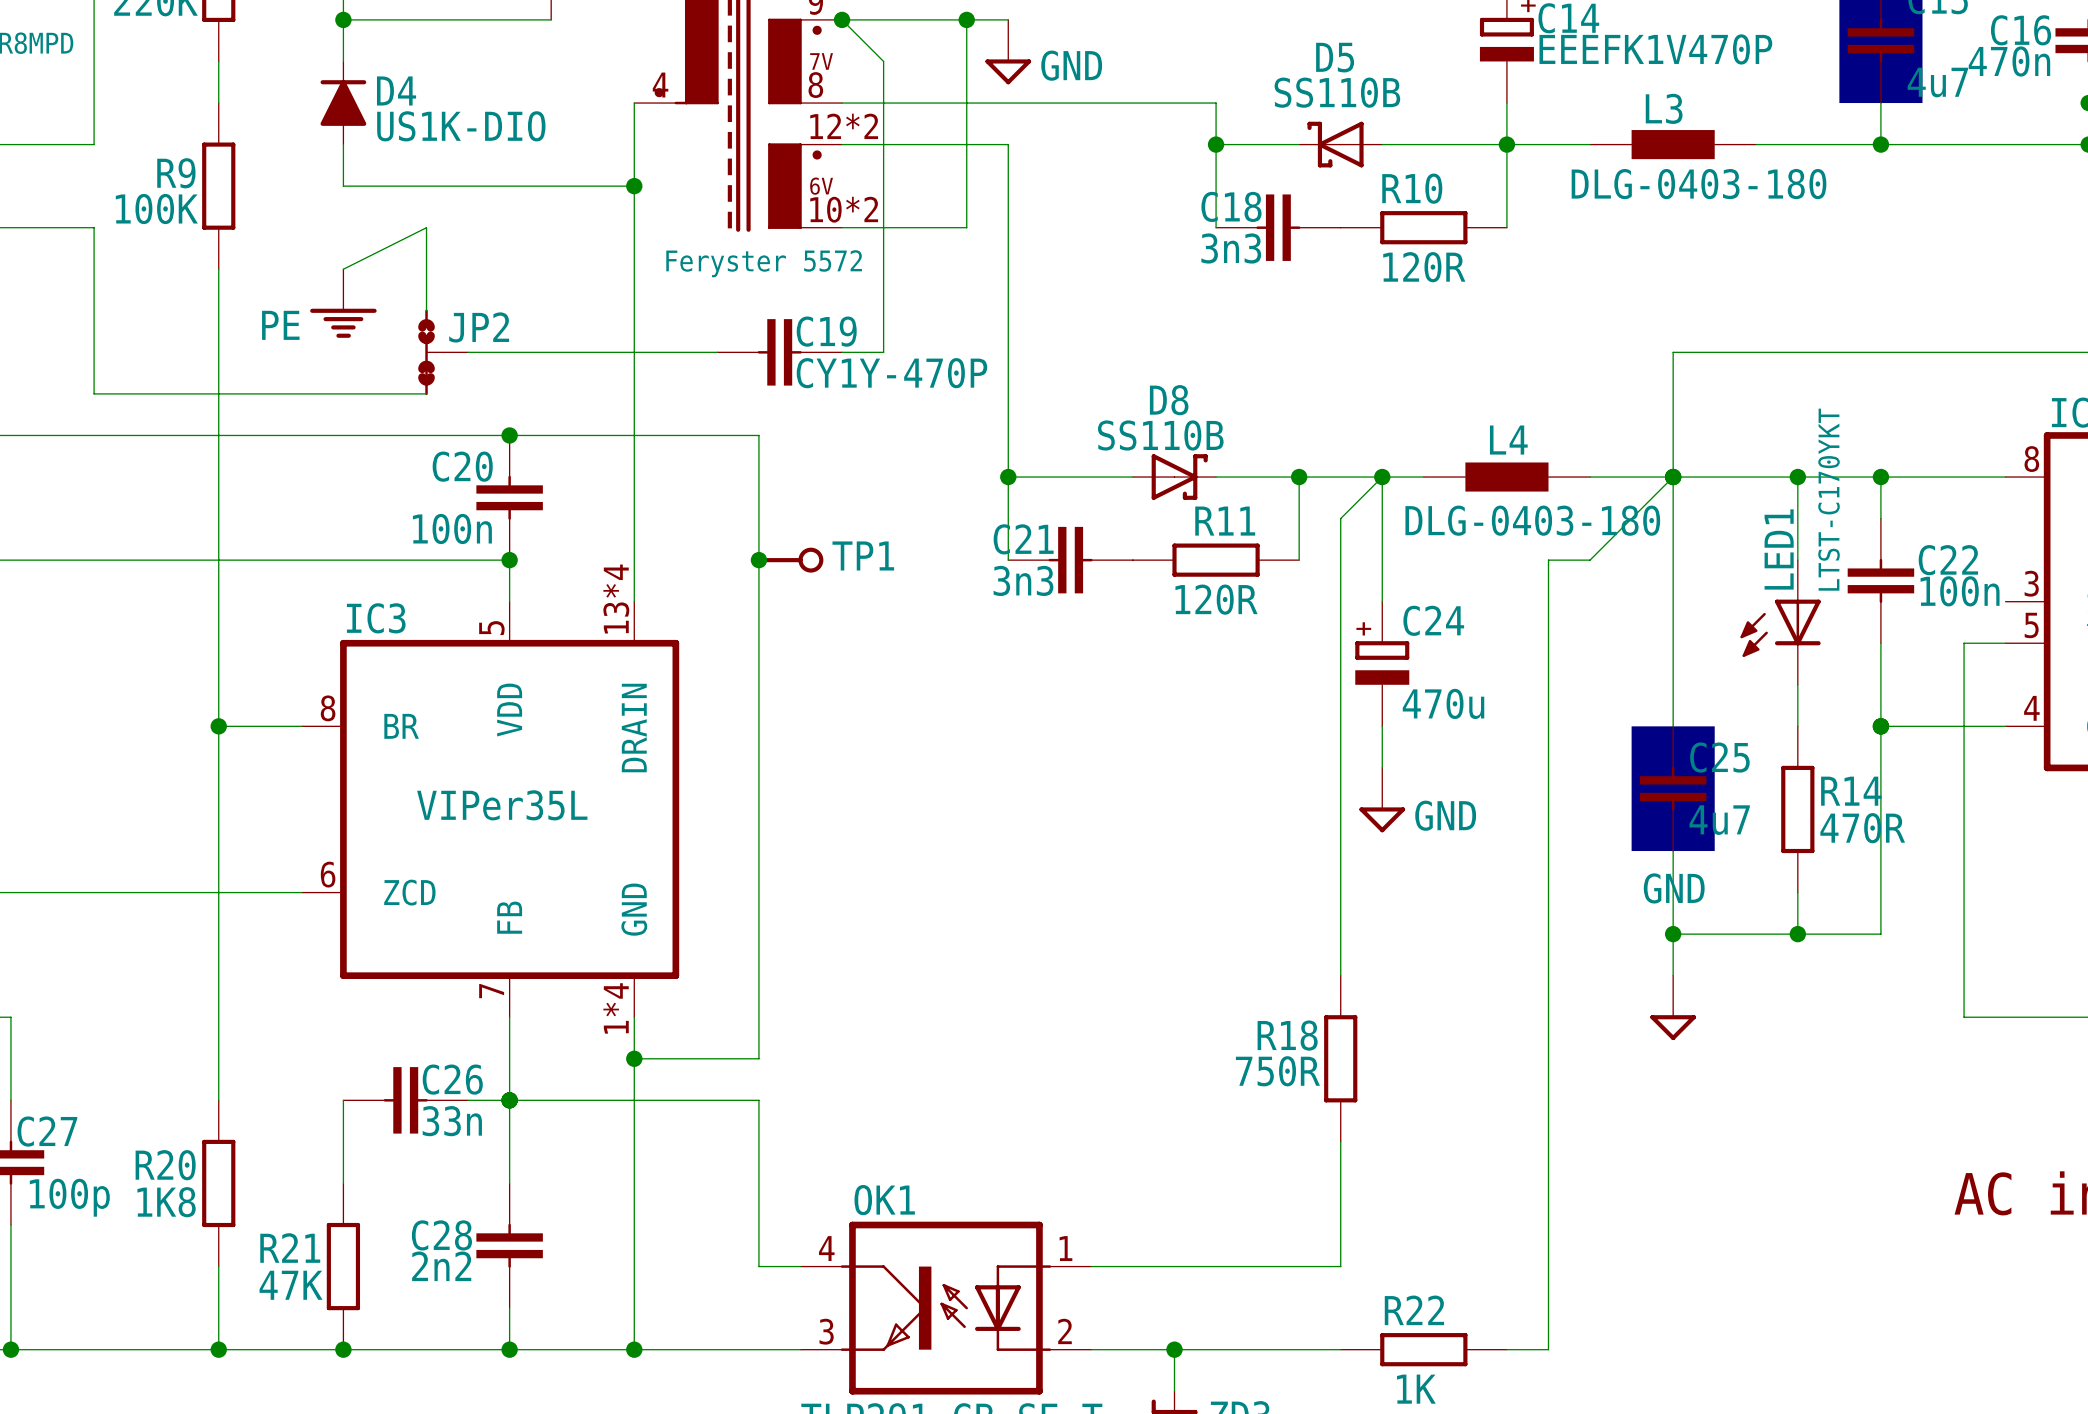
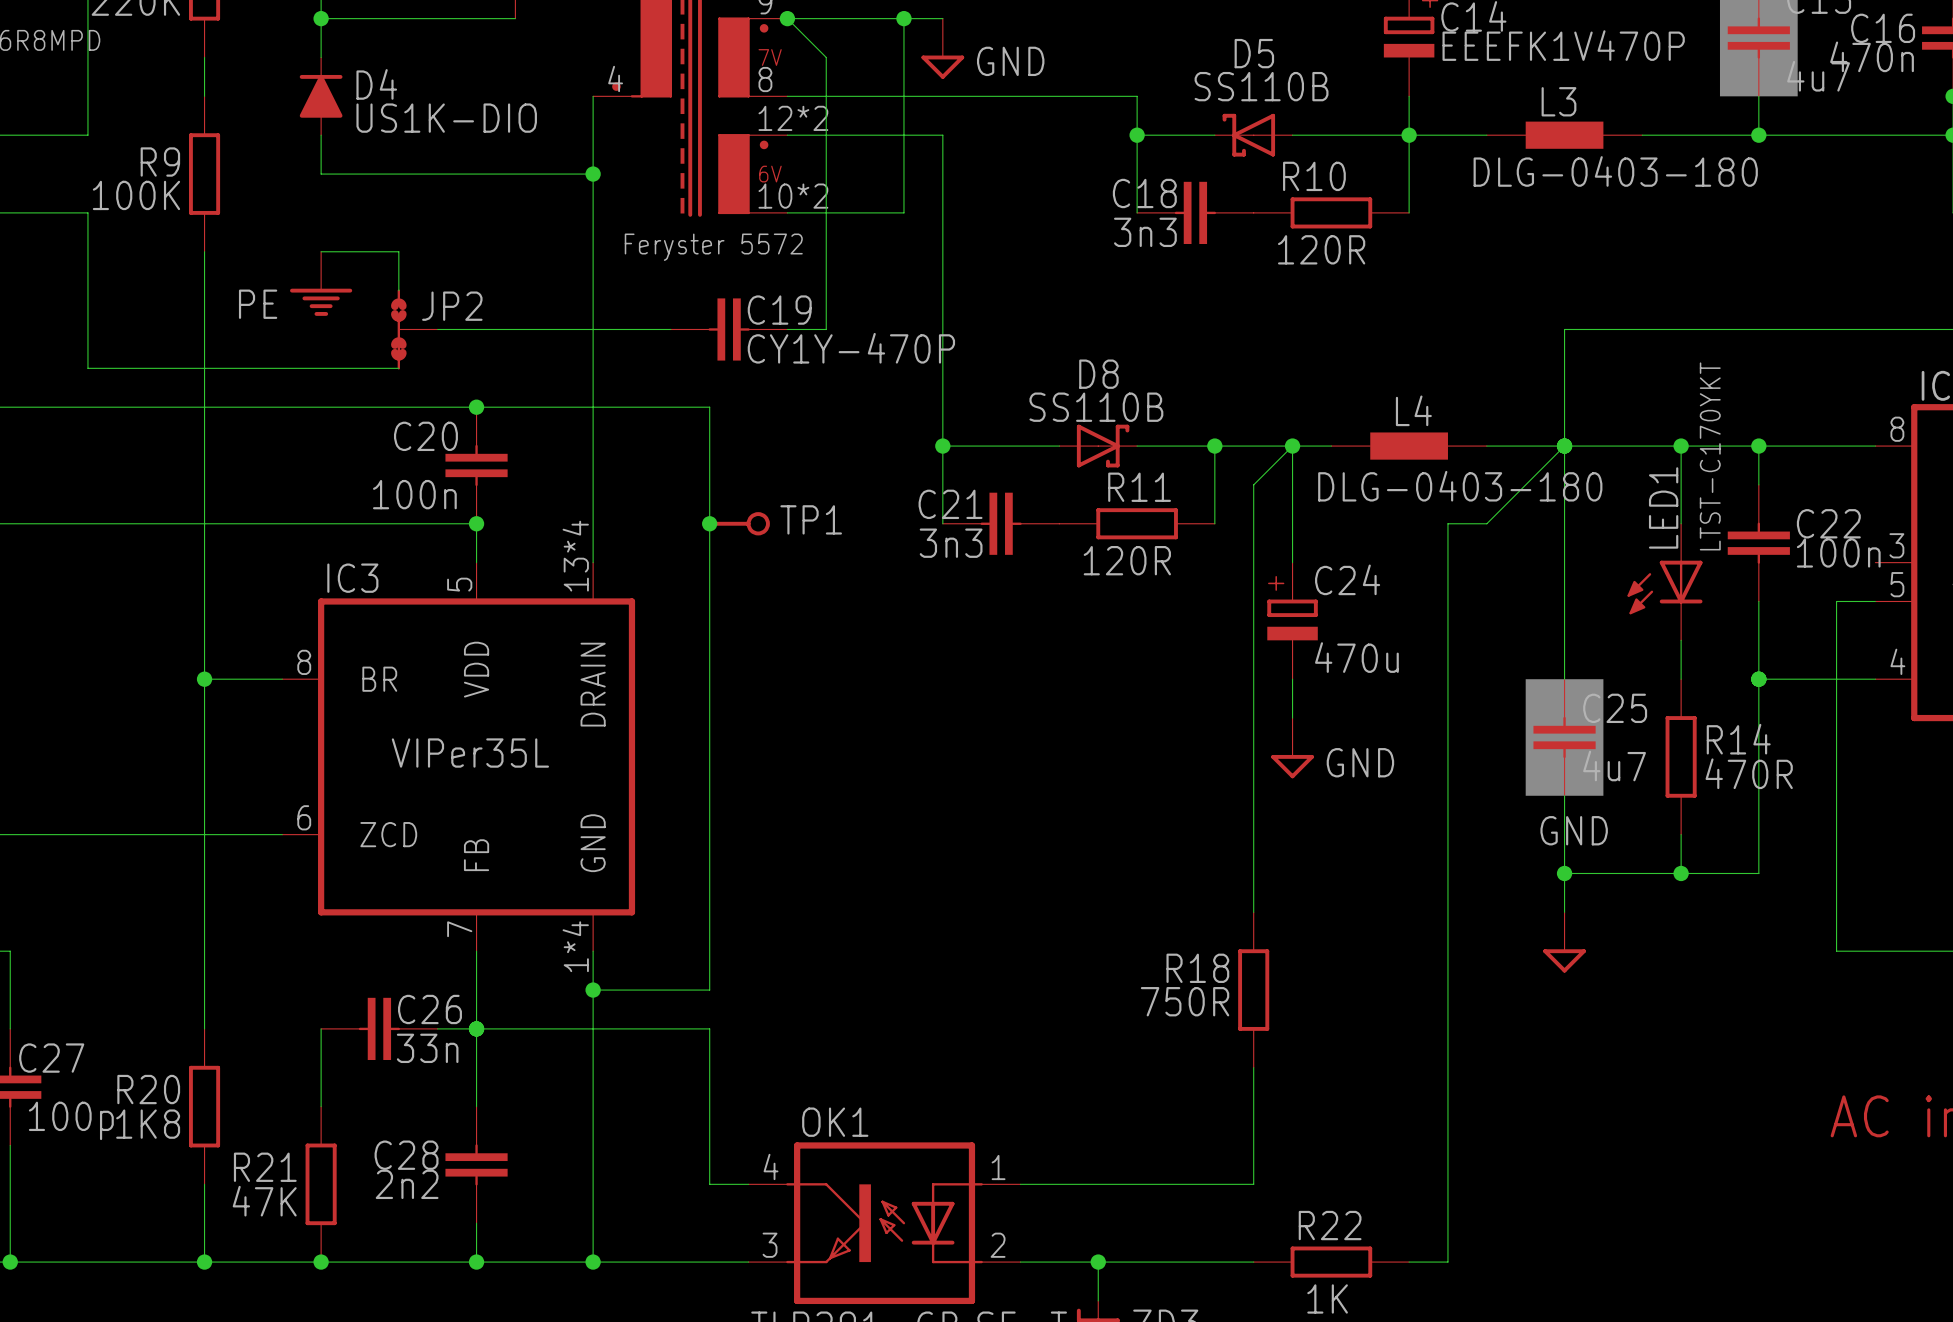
wire: (343, 269) (426, 227) (426, 269) -> (321, 251) (398, 251)

